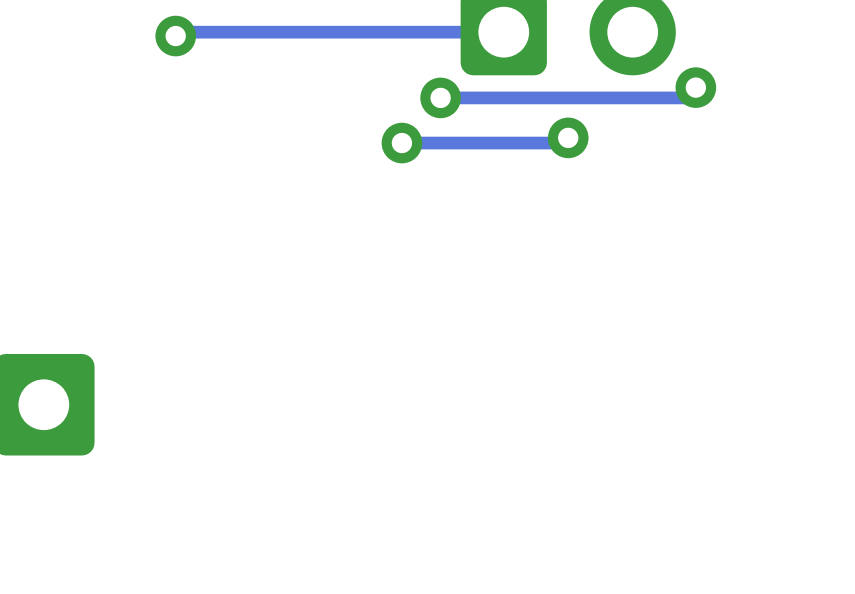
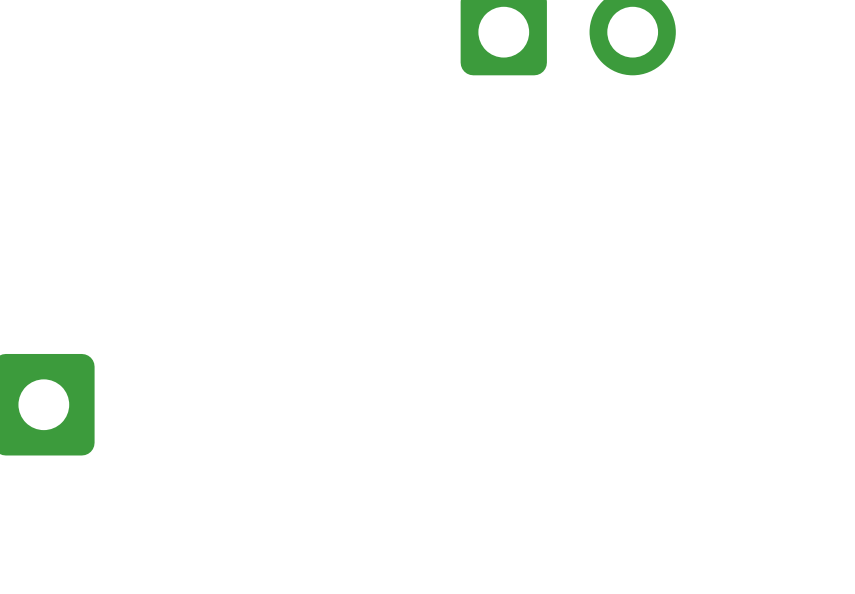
track: (503, 32) (179, 32) (175, 36) -> none
via: (175, 36) -> none
track: (695, 87) (685, 97) (440, 97) -> none
via: (695, 87) -> none
via: (440, 97) -> none
track: (568, 137) (563, 143) (401, 143) -> none
via: (568, 137) -> none
via: (401, 143) -> none

